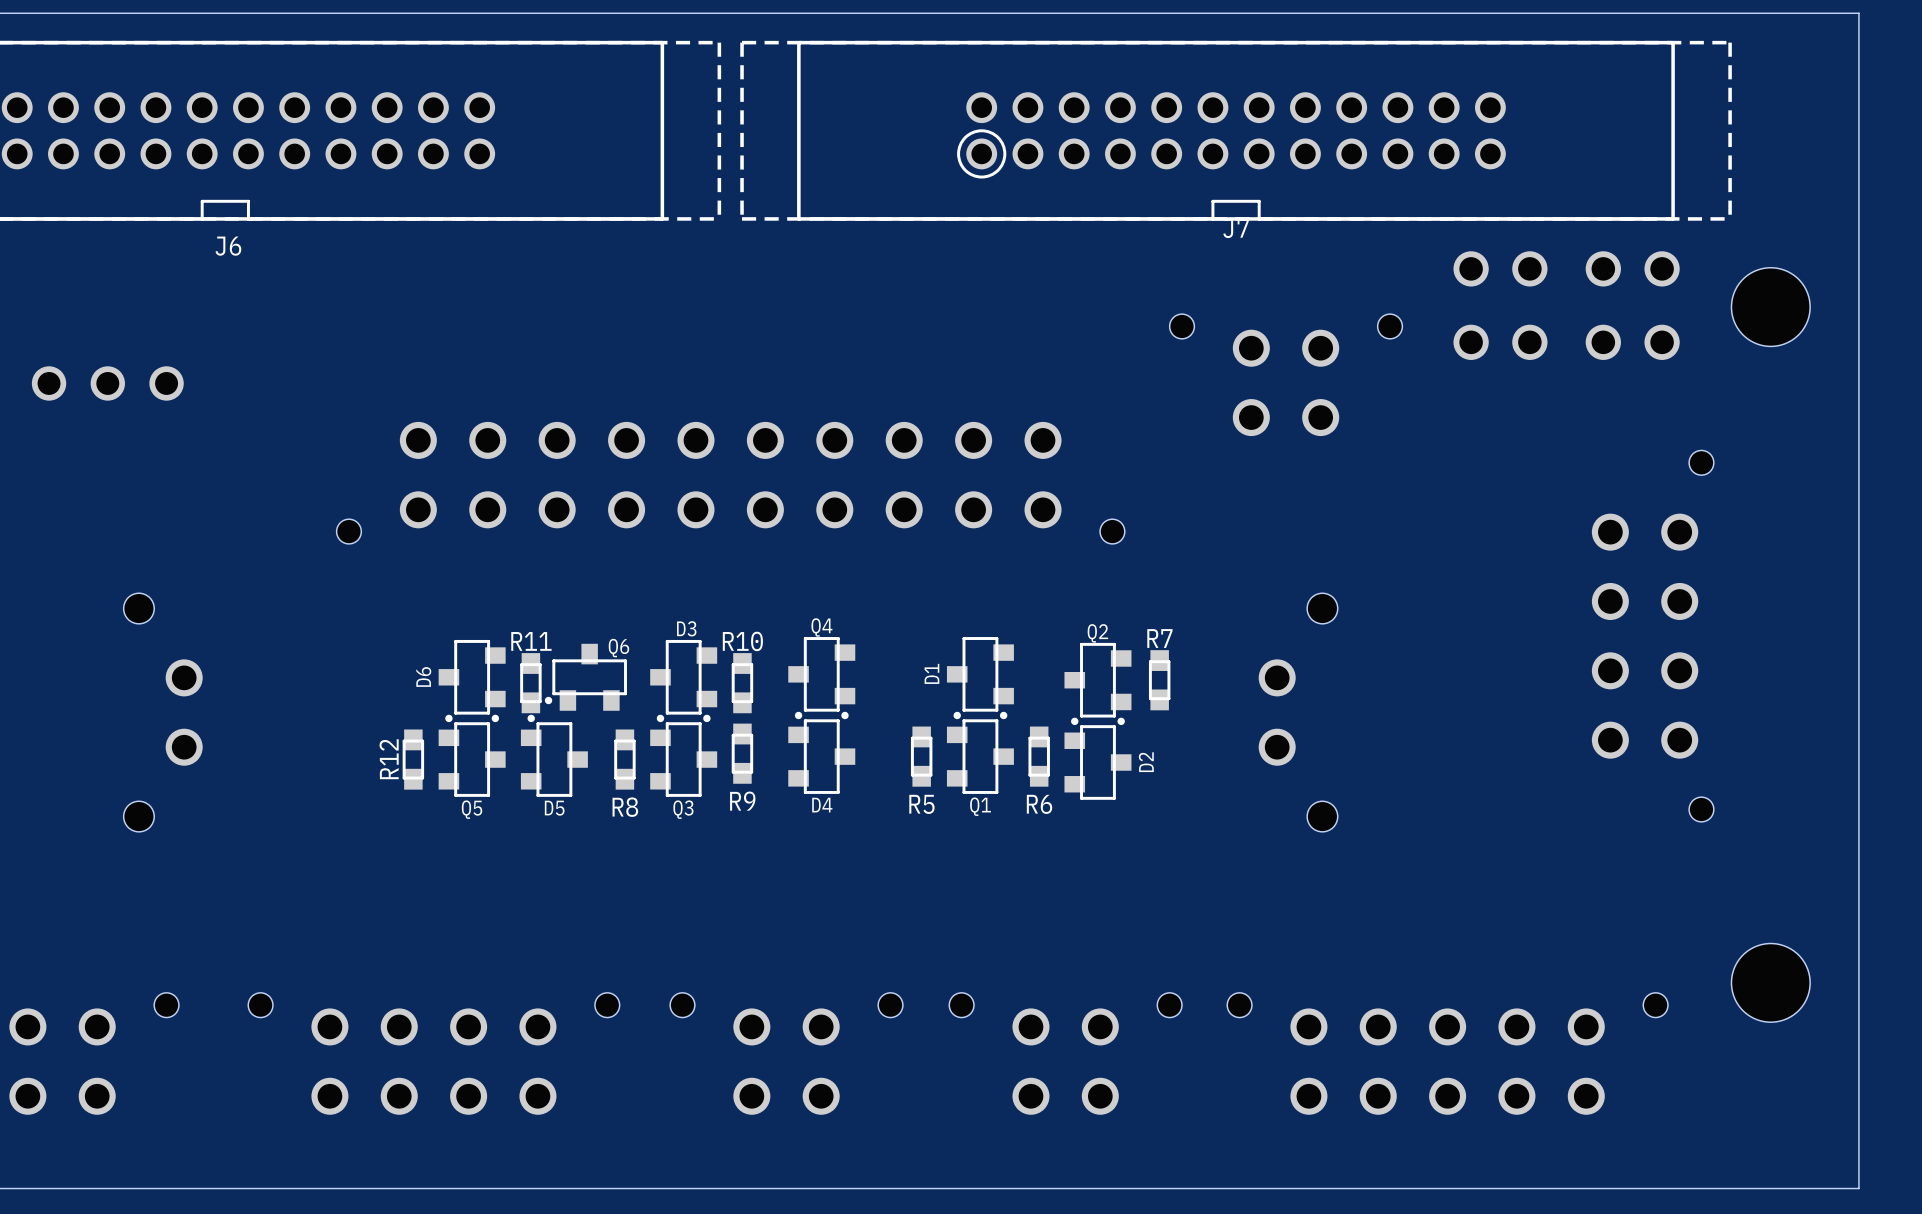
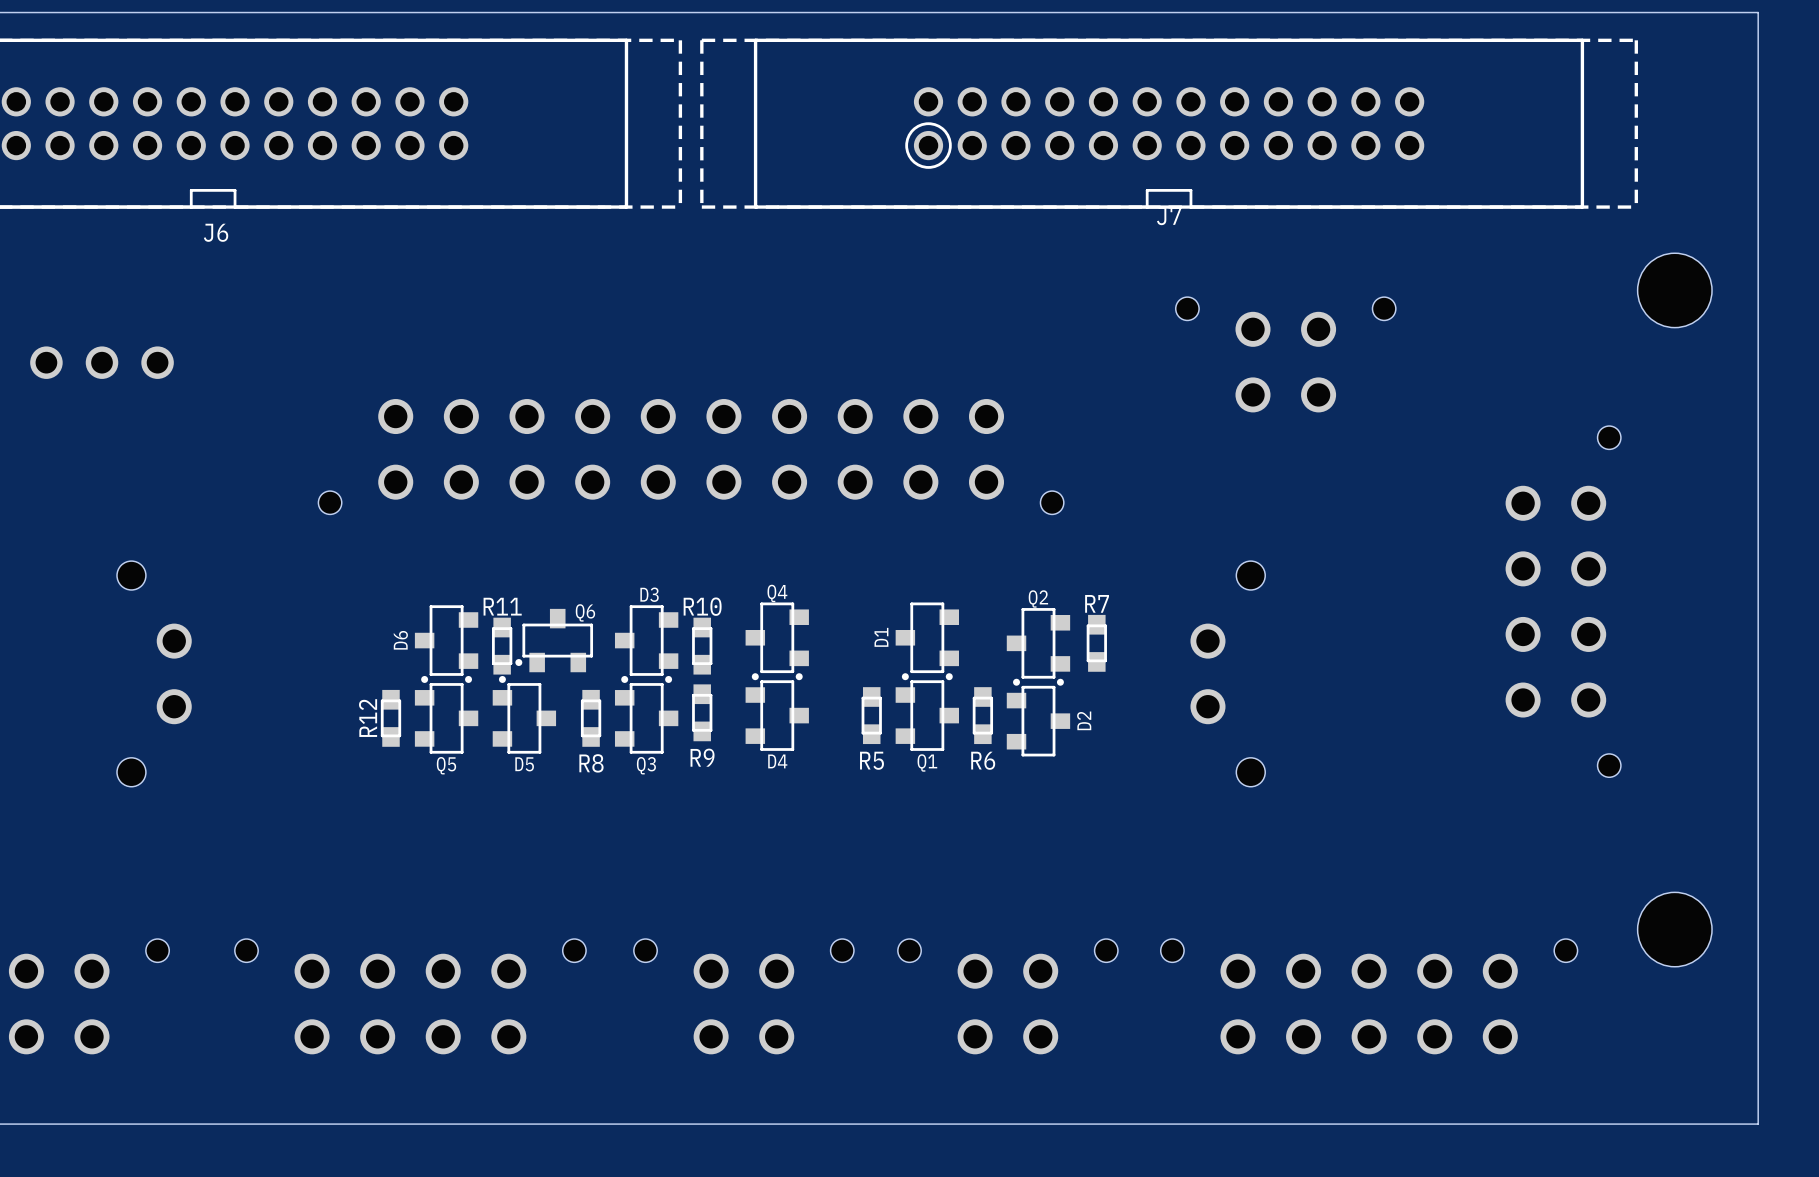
part: (1500, 268) -> none
part: (1632, 268) -> none
part: (1500, 342) -> none
part: (1632, 342) -> none
part position: (1286, 375) -> (1285, 354)

